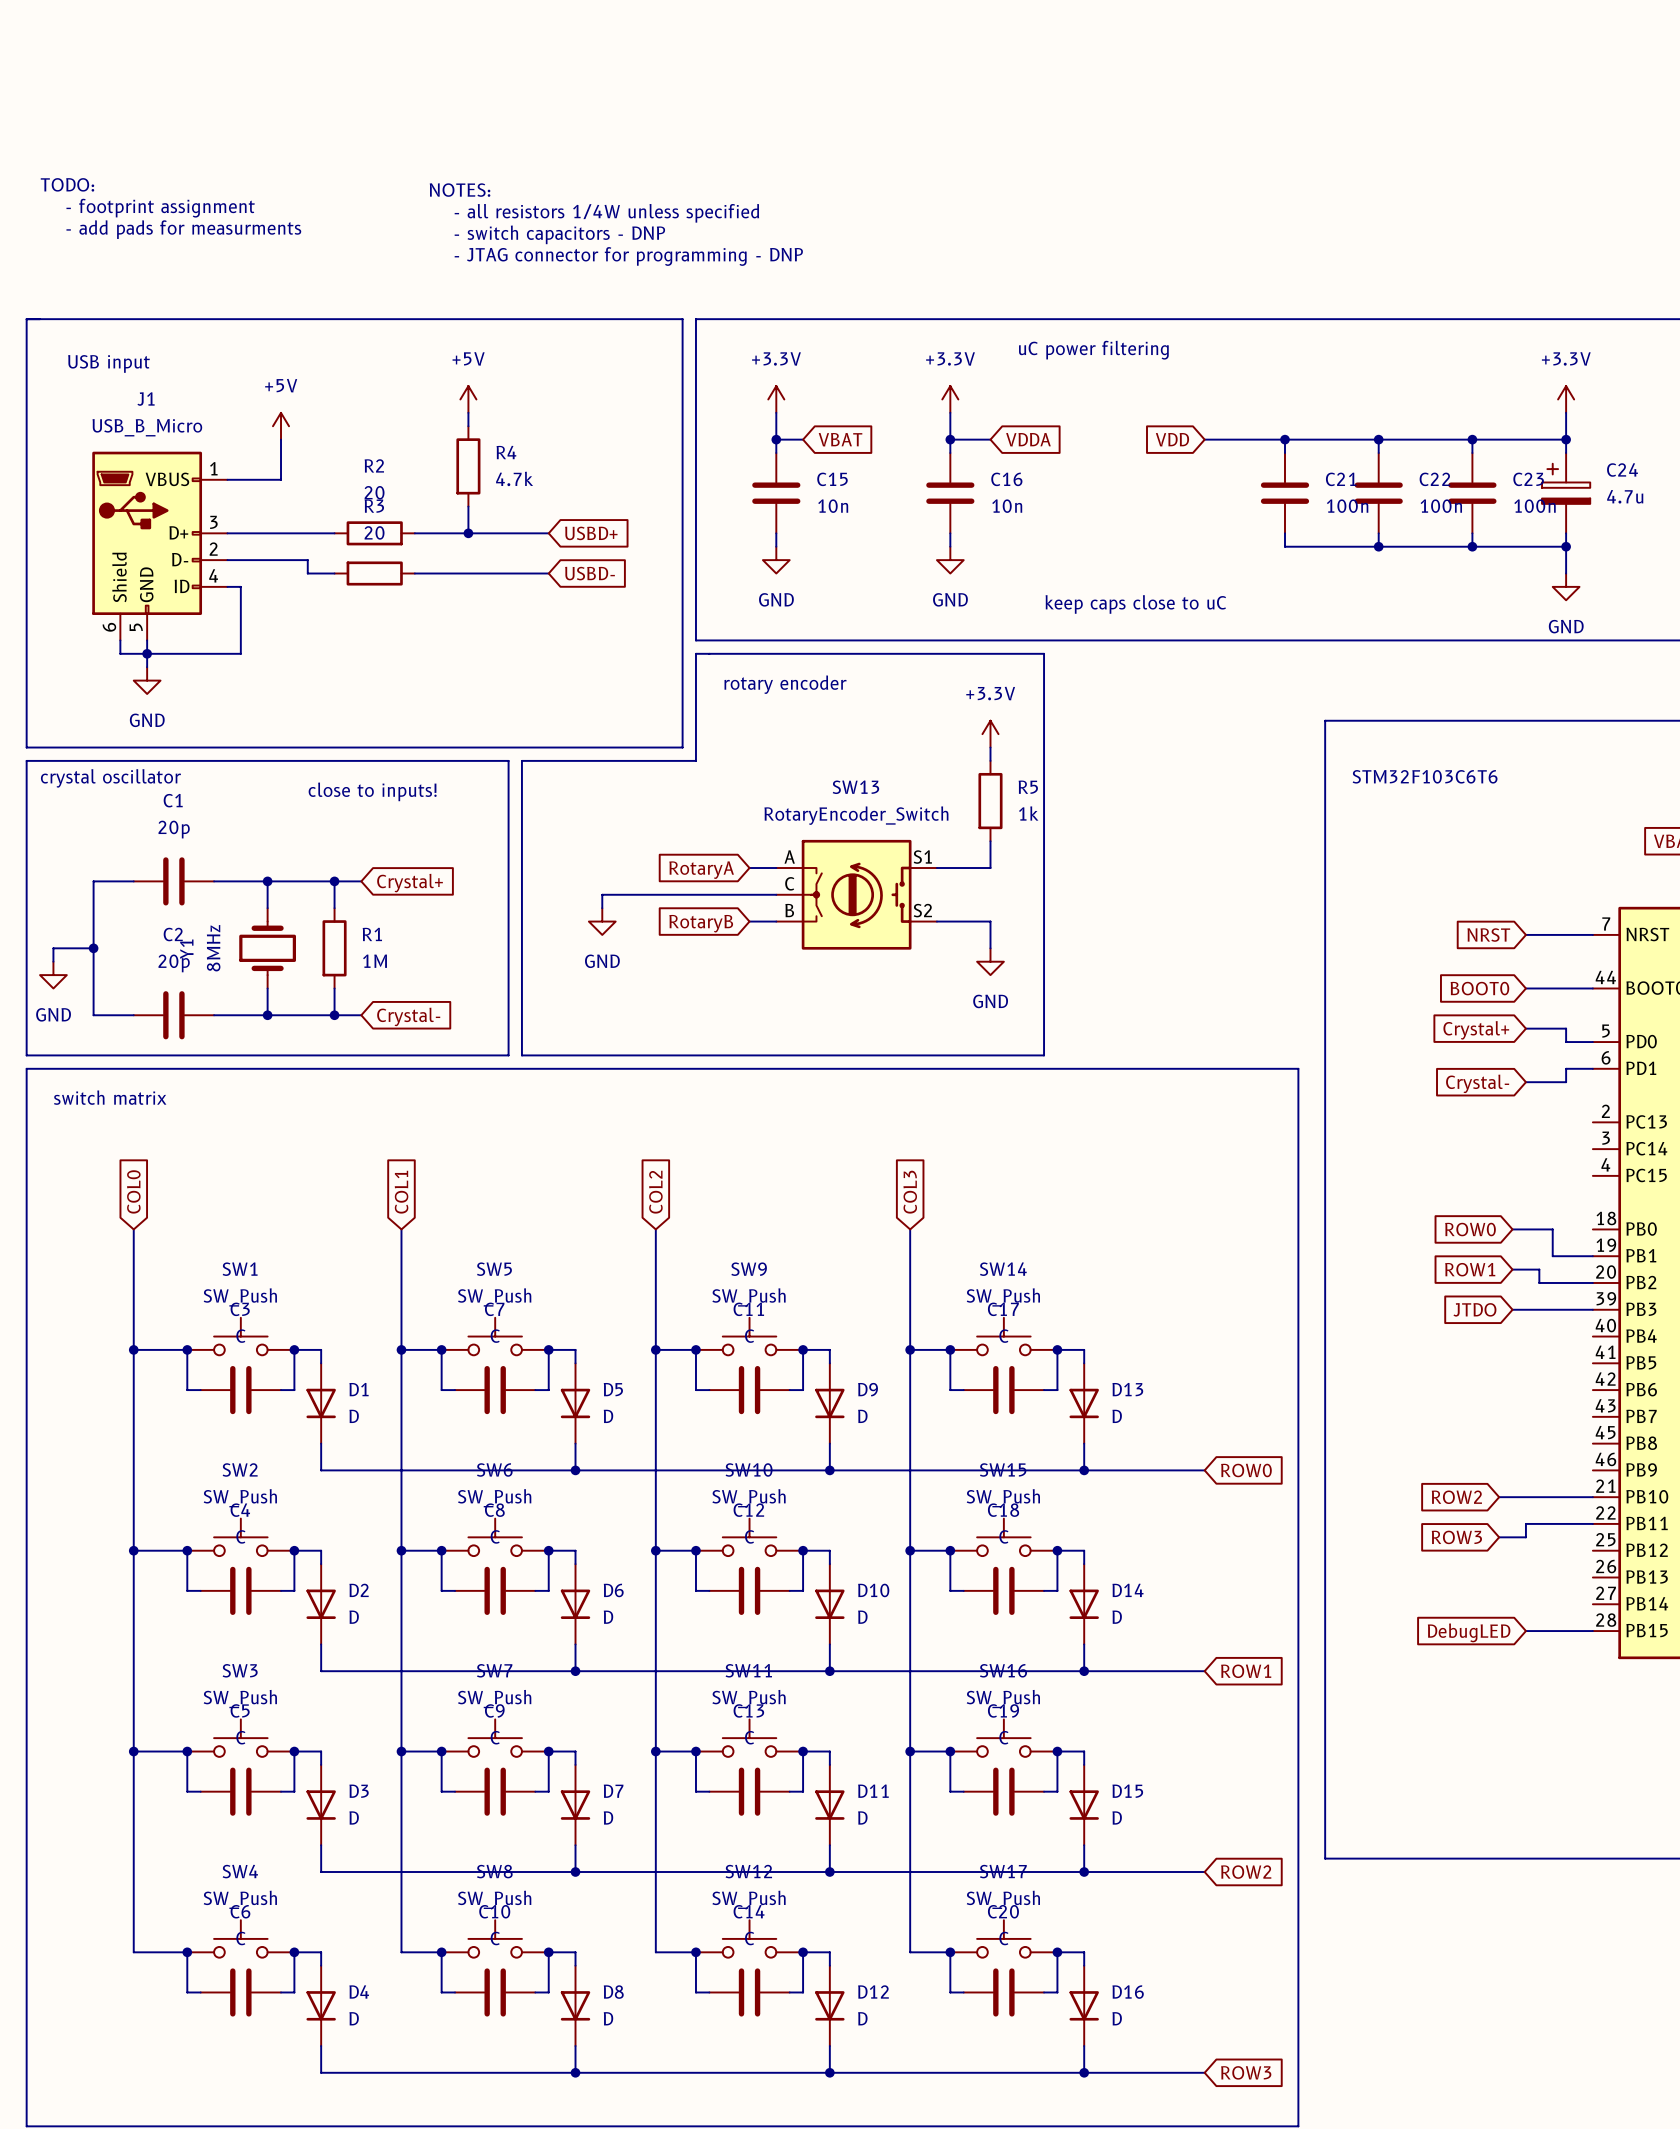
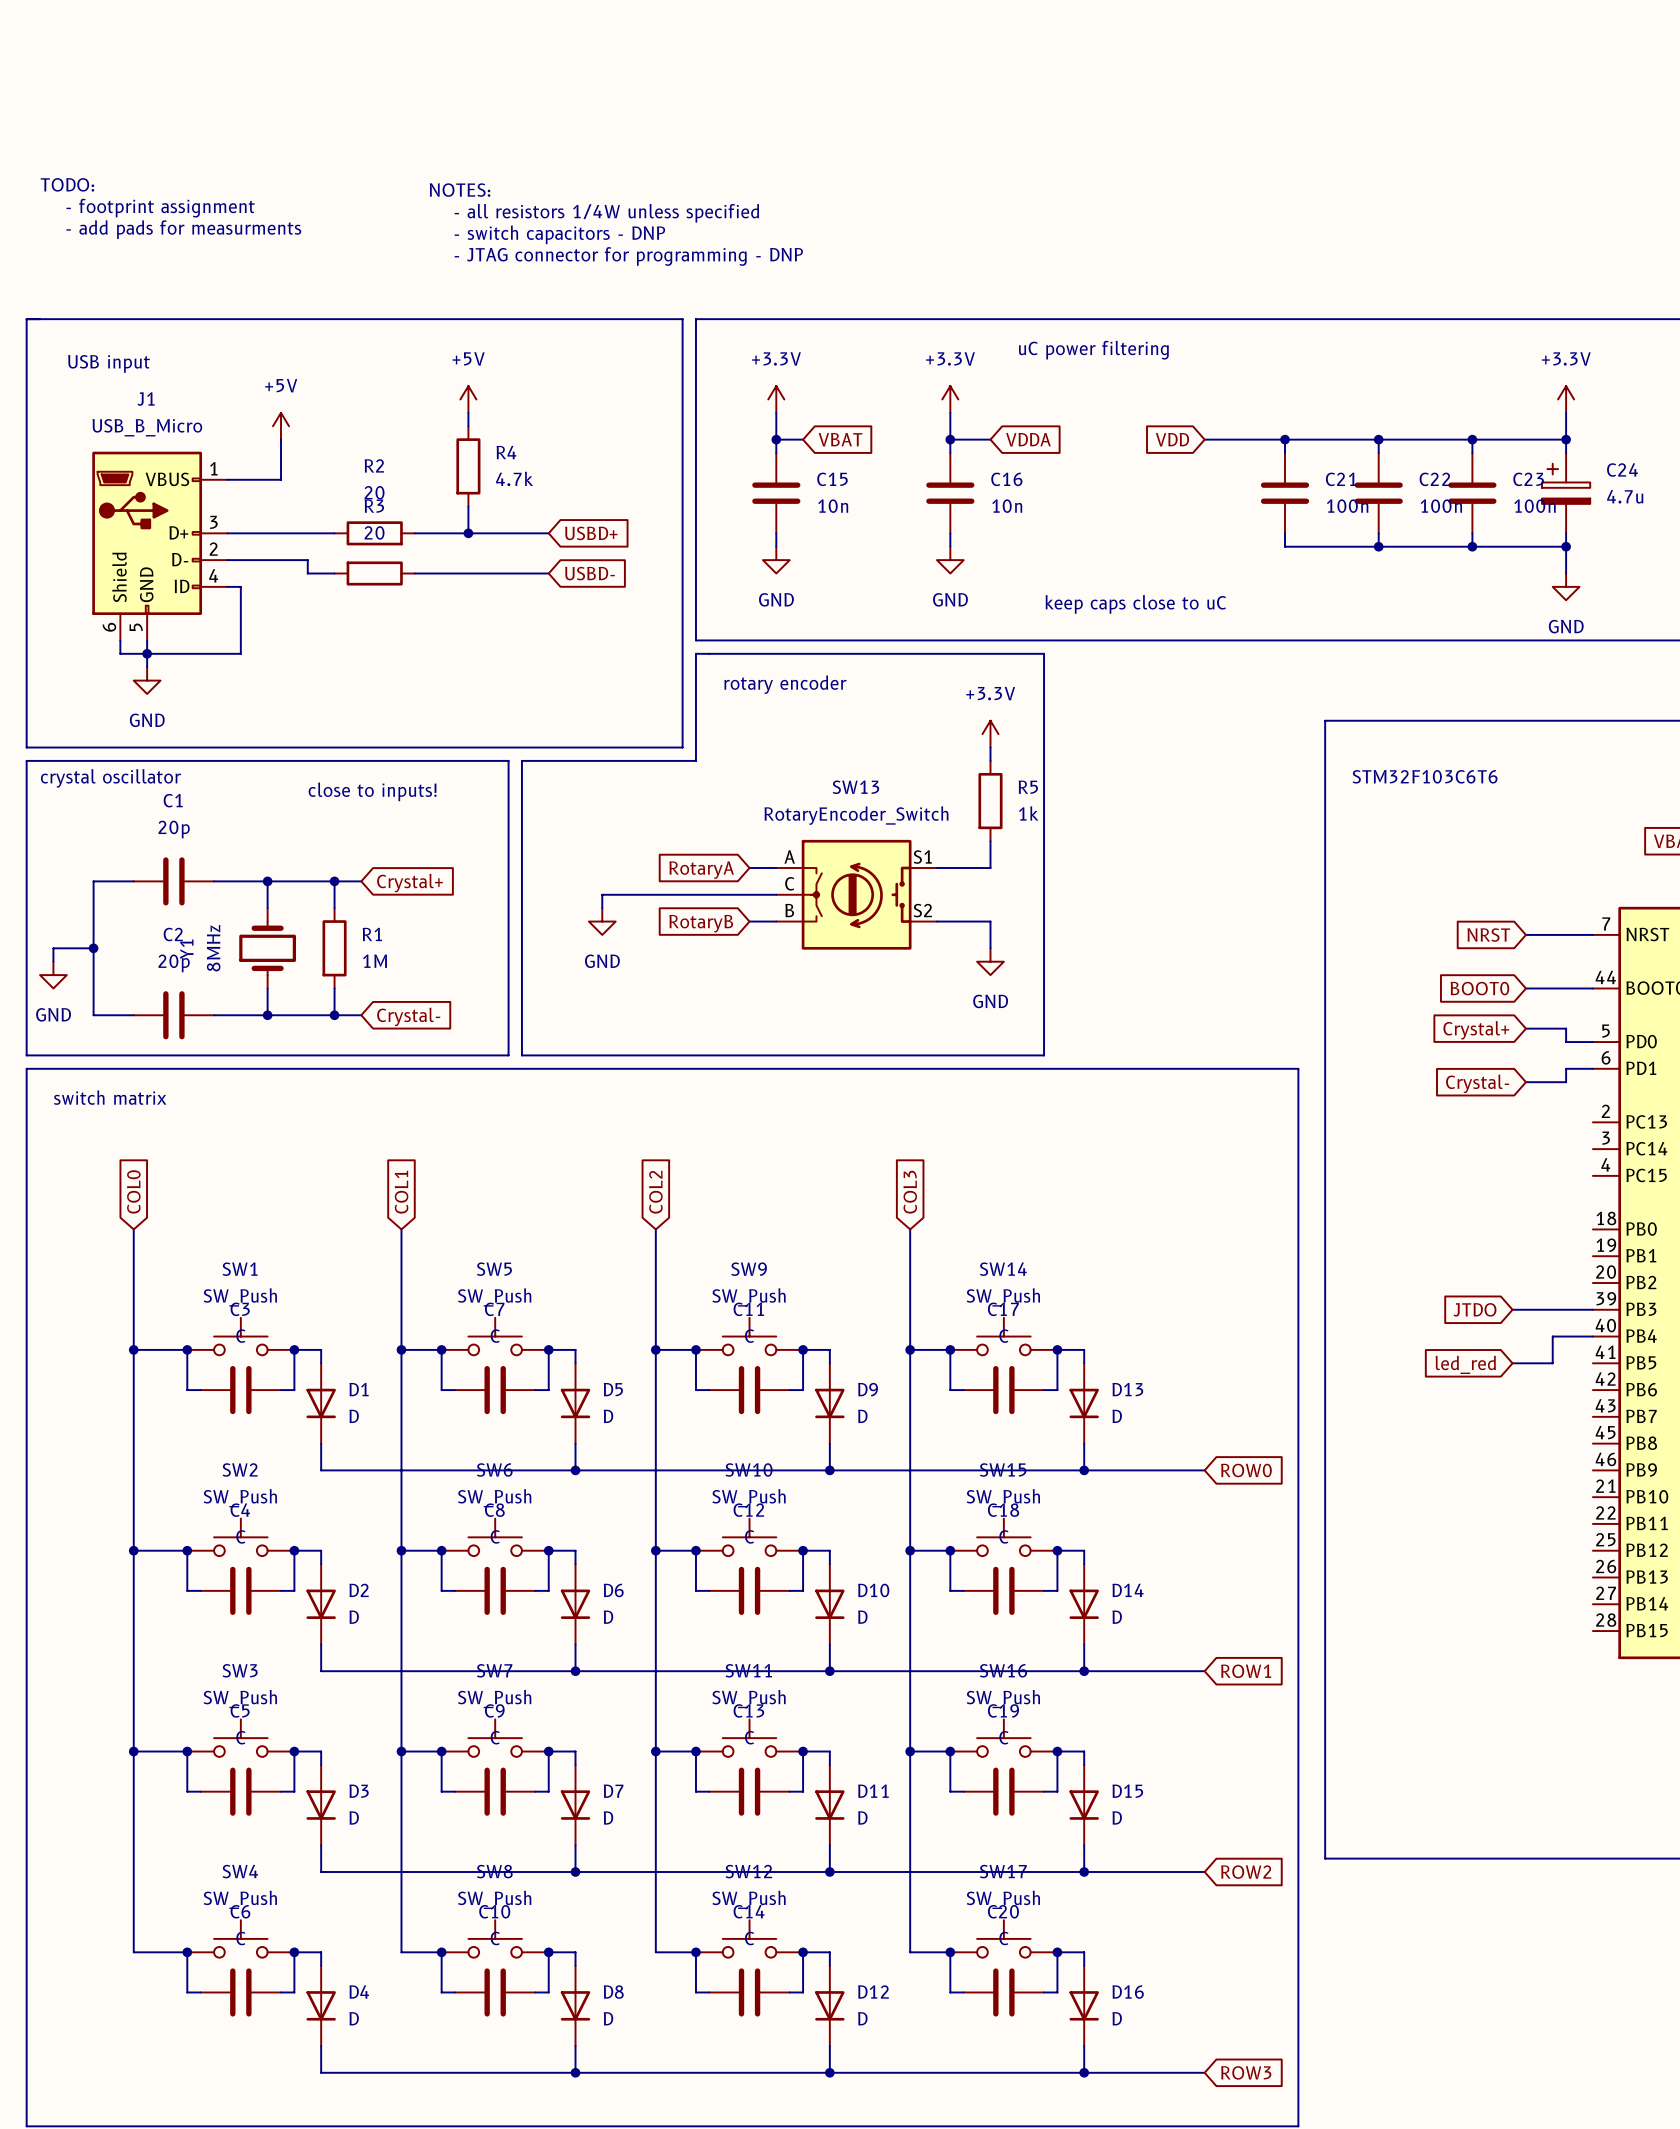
global label: ROW0 (1470, 1229) -> none
wire: (1512, 1229) (1552, 1229) (1552, 1256) (1592, 1256) -> none
global label: ROW1 (1470, 1269) -> none
wire: (1512, 1269) (1539, 1269) (1539, 1282) (1592, 1282) -> none
wire: none -> (1592, 1336) (1552, 1336) (1552, 1363) (1512, 1363)
global label: none -> led_red (1465, 1364)
global label: ROW2 (1456, 1497) -> none
wire: (1499, 1497) (1592, 1497) -> none
wire: (1592, 1523) (1525, 1523) (1525, 1537) (1499, 1537) -> none
global label: ROW3 (1456, 1537) -> none
wire: (1525, 1631) (1592, 1631) -> none
global label: DebugLED (1469, 1632) -> none

